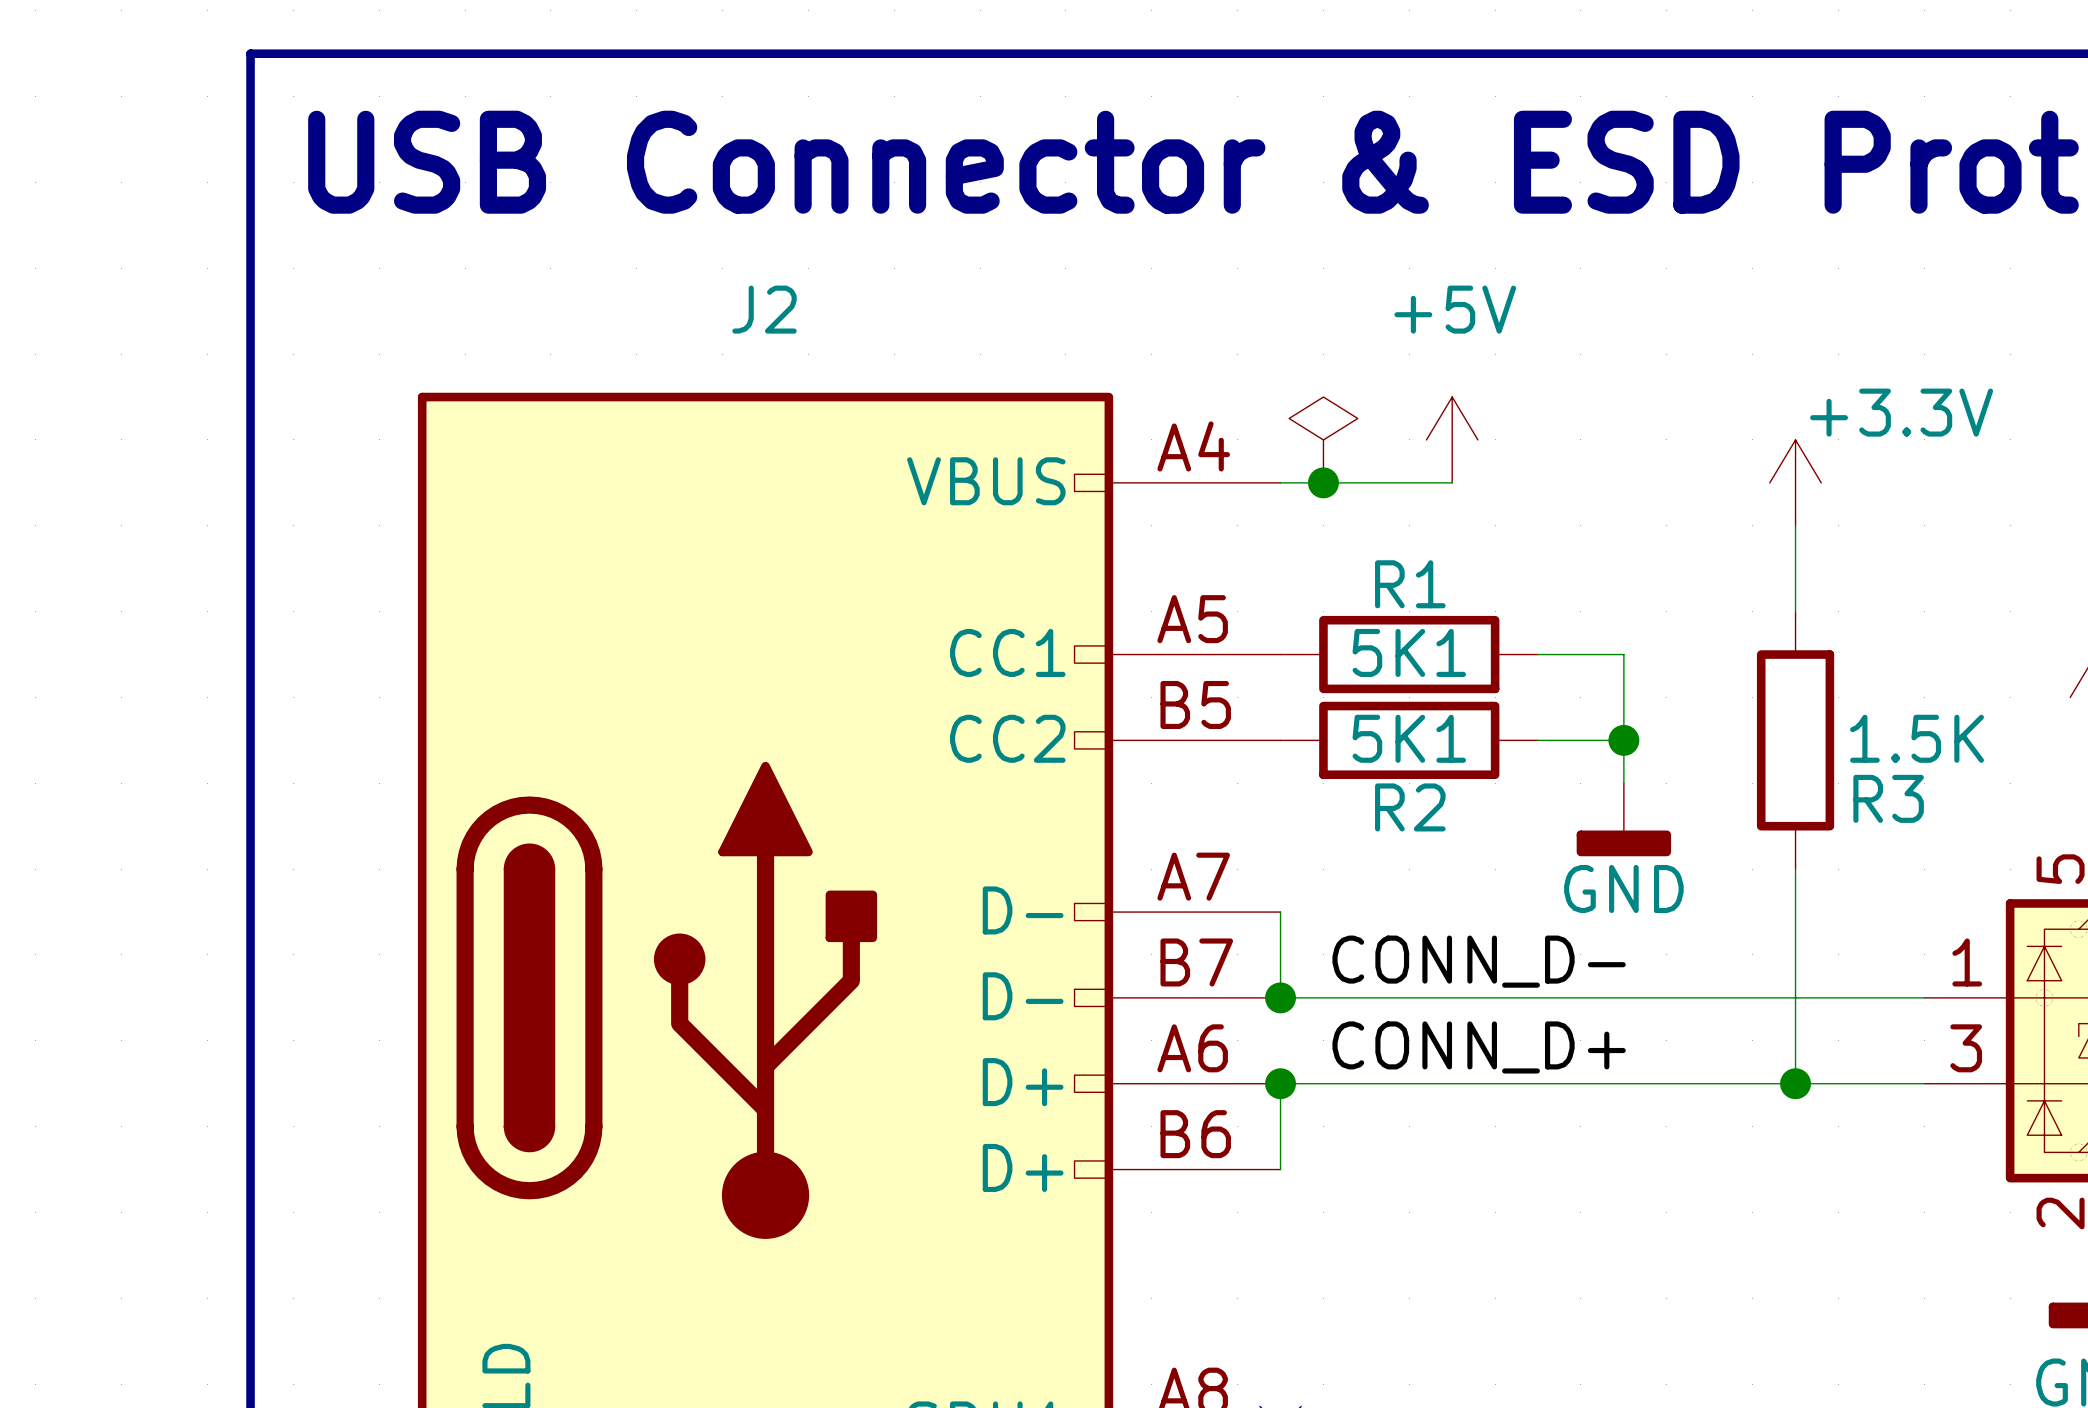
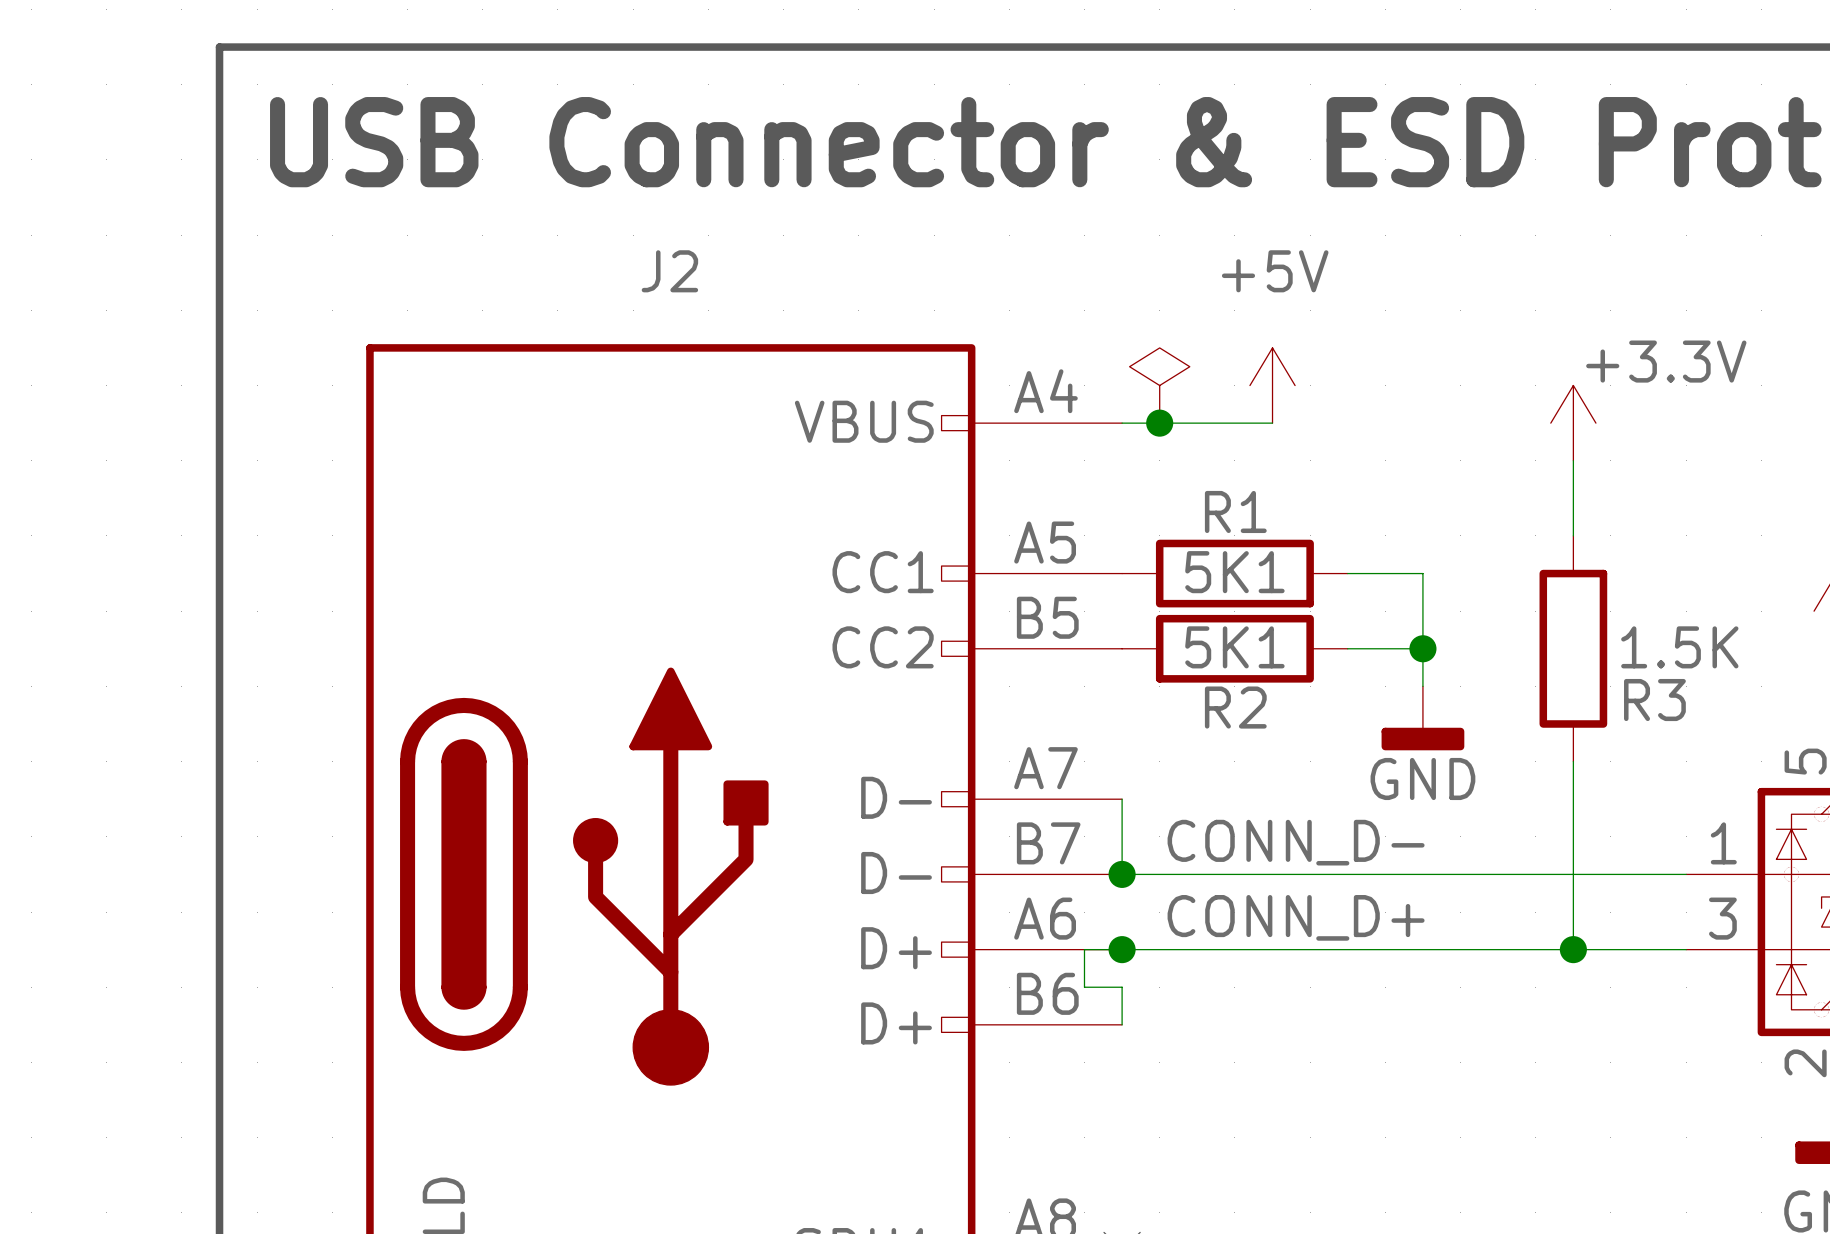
wire: (1280, 1083) (1280, 1126) -> (1122, 949) (1084, 949) (1084, 987) (1122, 987)

